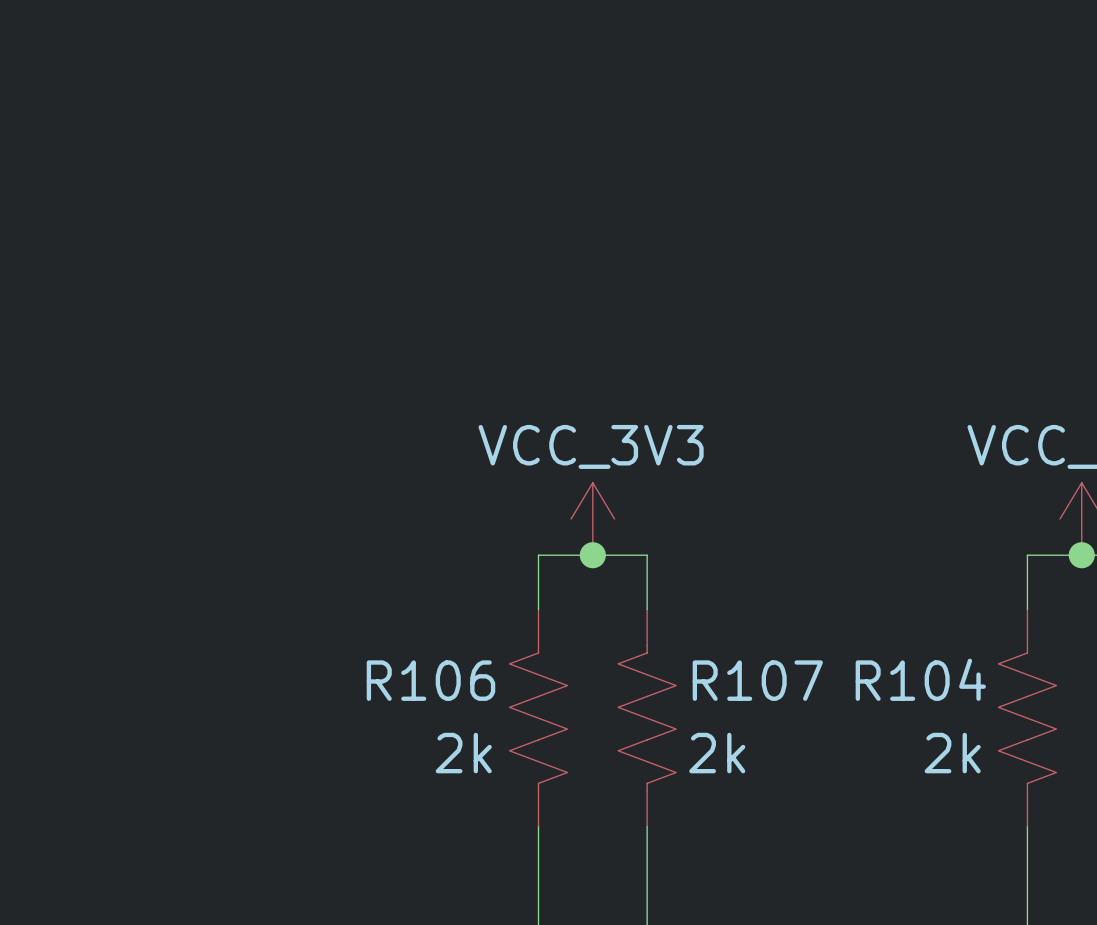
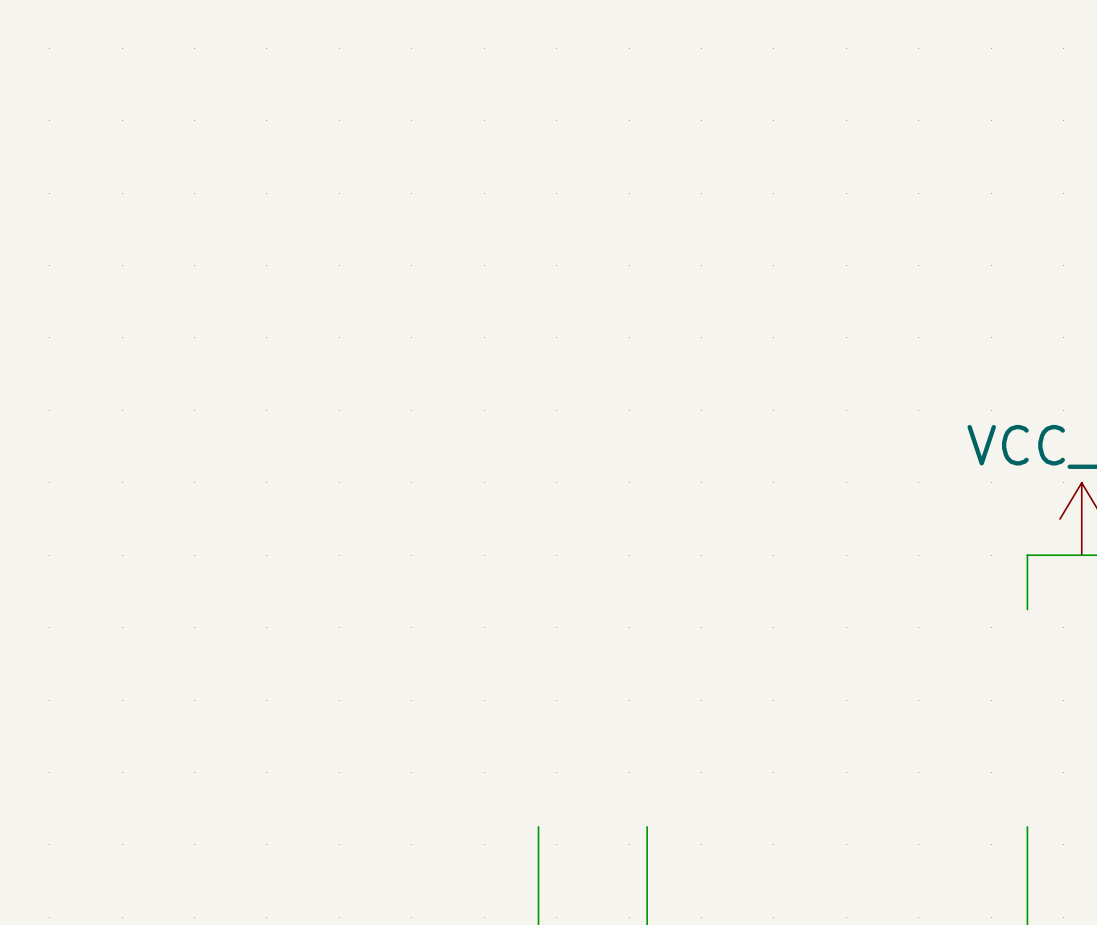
power symbol: VCC_3V3 (592, 519) -> none
junction: (592, 555) -> none
junction: (1081, 555) -> none
wire: (538, 609) (538, 555) (647, 555) (647, 609) -> none
R106: 2k (538, 718) -> none
R107: 2k (647, 718) -> none
R104: 2k (1027, 718) -> none

